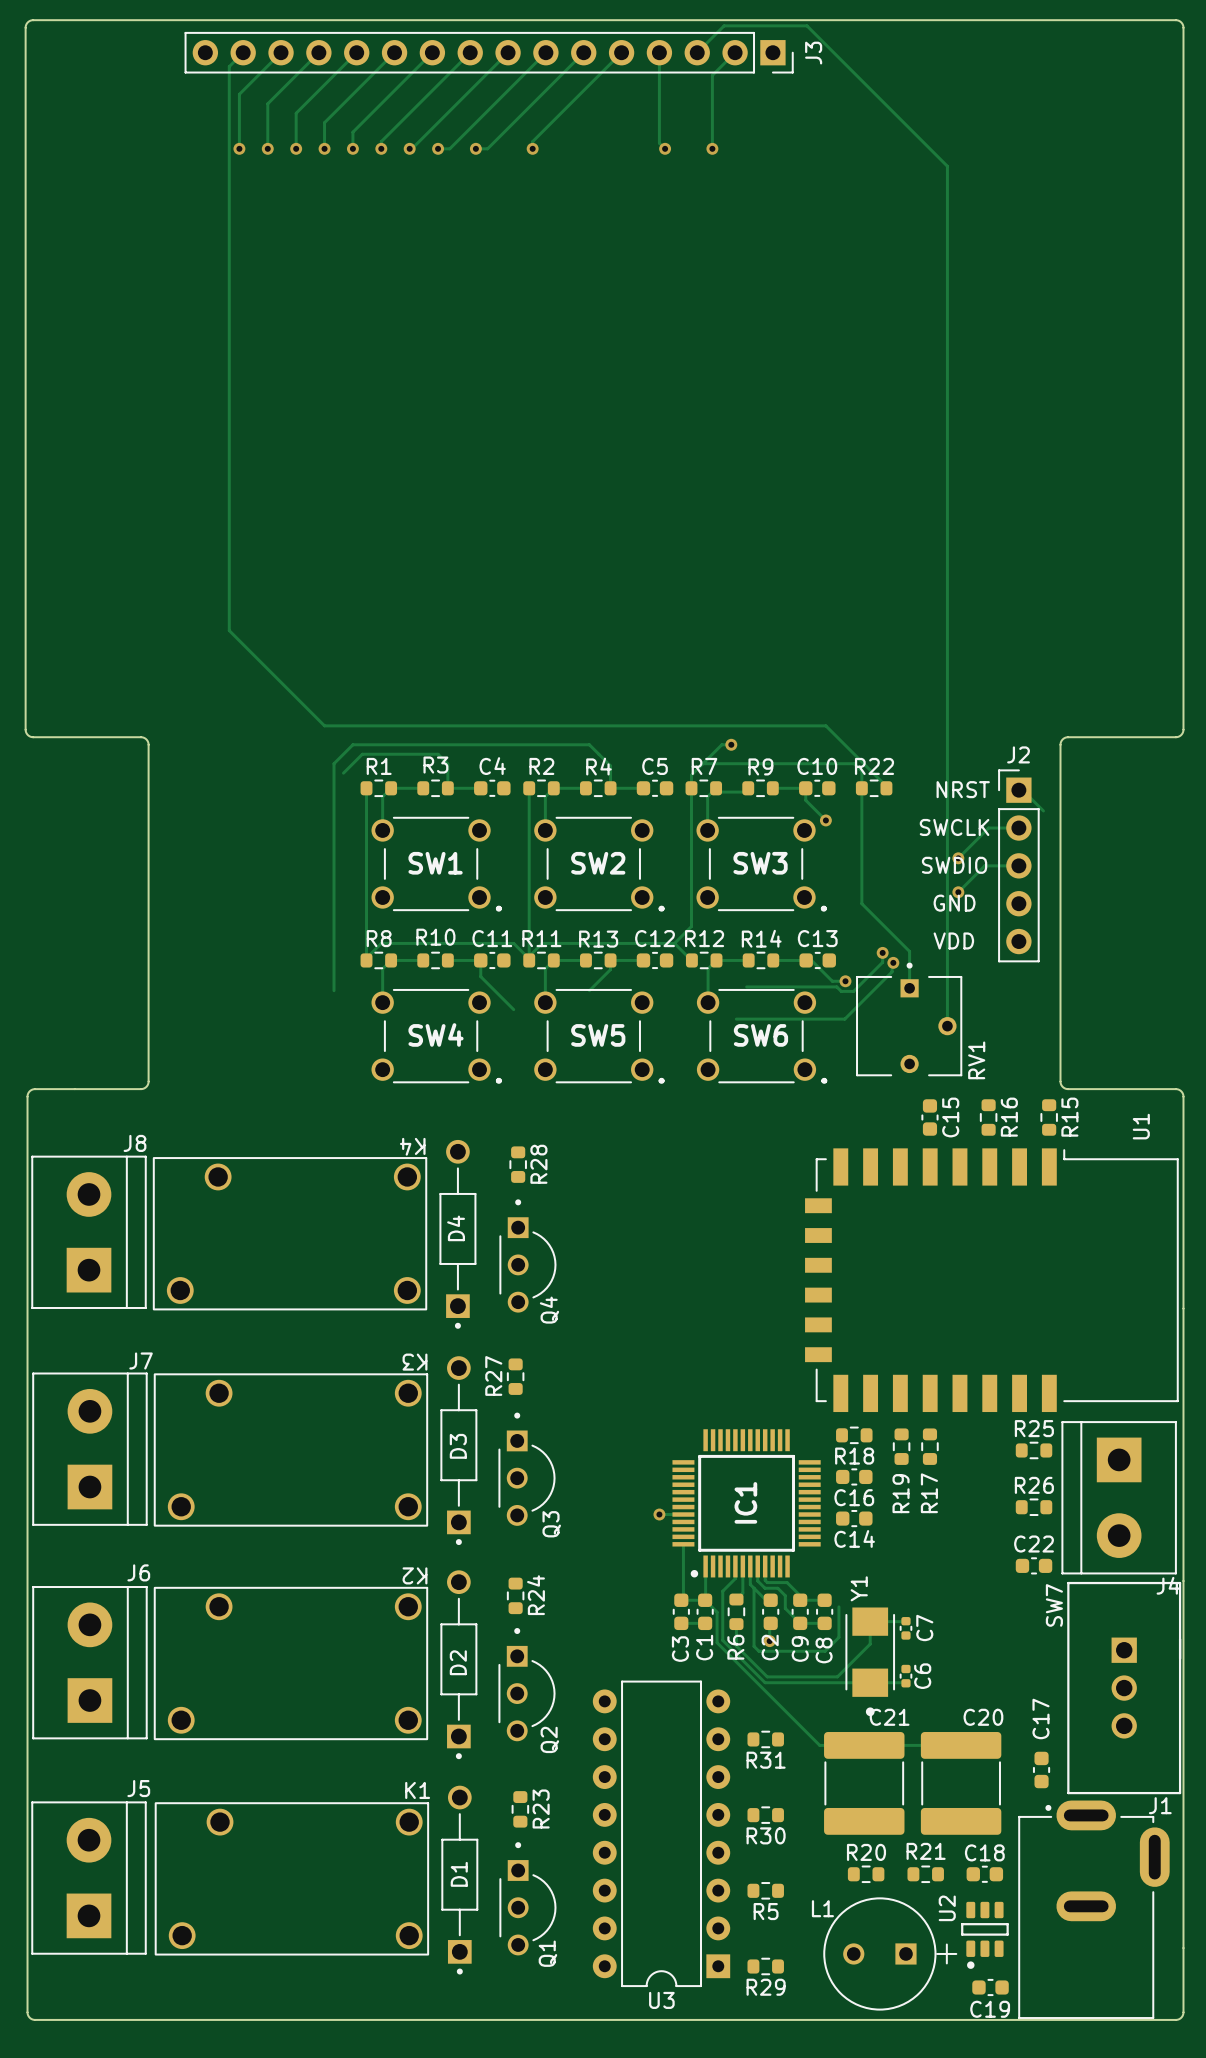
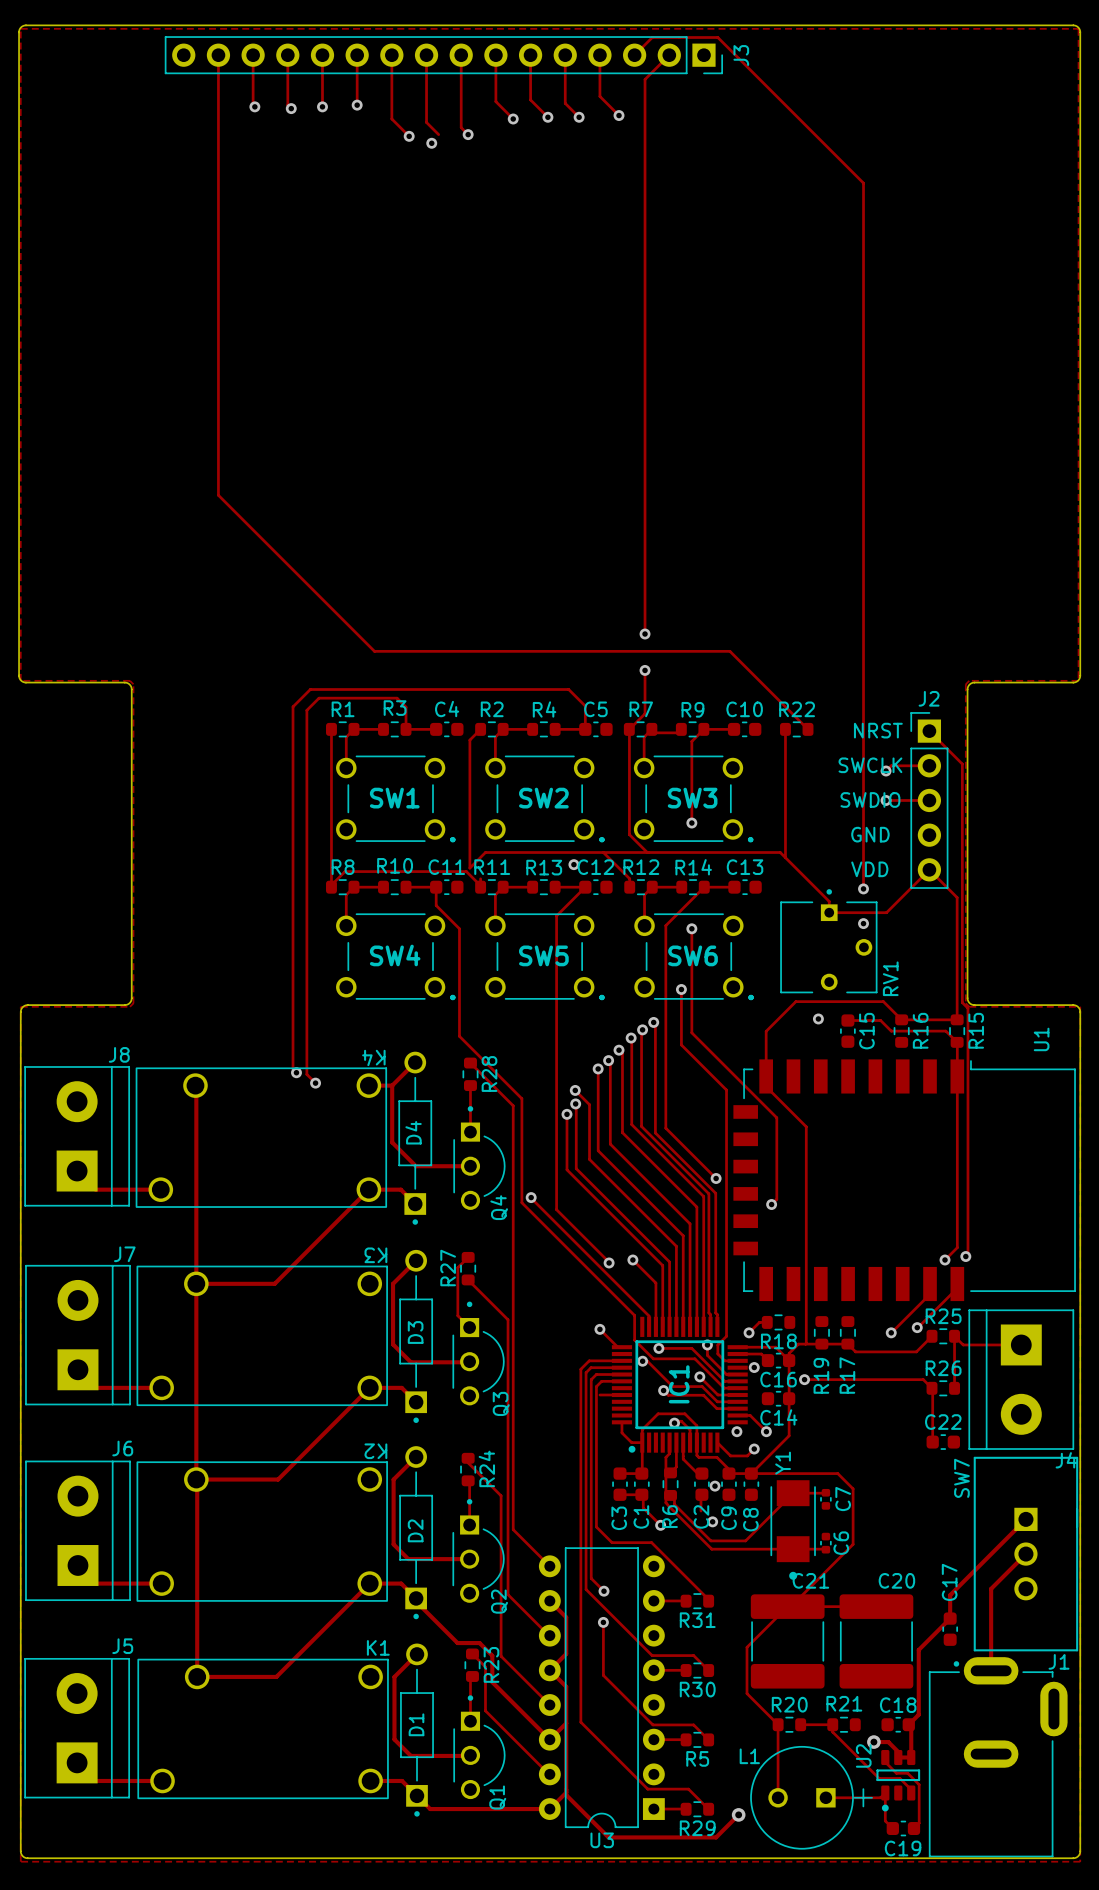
zone outline: none -> (20, 28) (20, 680) (130, 680) (133, 684) (133, 1003) (130, 1006) (20, 1006) (20, 1861) (1080, 1861) (1080, 1006) (969, 1006) (965, 1003) (965, 684) (969, 680) (1078, 680) (1078, 28) (20, 28)
track: (716, 33) (724, 25) (806, 25) (947, 166) (947, 1026) -> (652, 37) (717, 37) (863, 183) (863, 888)
track: (243, 52) (229, 66) (229, 630) (324, 725) (825, 725) (886, 788) -> (218, 55) (218, 495) (374, 651) (729, 651) (808, 729)
track: (281, 52) (239, 94) (239, 148) -> (253, 55) (253, 105) (254, 106)
track: (318, 52) (267, 103) (267, 148) -> (287, 55) (287, 105) (291, 108)
track: (356, 52) (296, 113) (296, 148) -> (322, 55) (322, 106)
track: (394, 52) (324, 122) (324, 148) -> (357, 55) (357, 105)
track: (432, 52) (352, 132) (352, 148) -> (391, 55) (391, 119) (409, 136)
track: (470, 52) (381, 141) (381, 148) -> (426, 55) (426, 122) (438, 134)
track: (508, 52) (411, 148) (409, 148) -> (461, 55) (461, 127) (468, 134)
track: (545, 52) (449, 148) (438, 148) -> (495, 55) (495, 101) (513, 119)
track: (583, 52) (487, 148) (475, 148) -> (530, 55) (530, 99) (547, 117)
track: (621, 52) (532, 141) (532, 148) -> (565, 55) (565, 103) (579, 117)
track: (712, 75) (712, 148) -> (648, 75) (645, 79) (645, 634)
track: (659, 97) (659, 143) (665, 148) -> (599, 96) (619, 115)
via: none -> (357, 105)
via: none -> (254, 106)
via: none -> (322, 106)
via: none -> (291, 108)
via: none -> (619, 115)
via: none -> (547, 117)
via: none -> (579, 117)
via: none -> (513, 119)
via: (239, 148) -> none
via: (267, 148) -> none
via: (296, 148) -> none
via: (324, 148) -> none
via: (352, 148) -> none
via: (381, 148) -> none
via: (409, 148) -> none
via position: (438, 148) -> (409, 136)
via position: (532, 148) -> (468, 134)
via: (665, 148) -> none
via: (712, 148) -> none
via: none -> (645, 634)
track: none -> (645, 670) (645, 713) (629, 729)
track: (352, 744) (334, 763) (334, 990) -> (319, 689) (310, 689) (293, 706) (293, 1069) (296, 1072)
track: (589, 744) (610, 765) (610, 788) -> (535, 689) (568, 689) (585, 706) (585, 729)
track: (731, 744) (721, 744) (691, 775) (691, 926) (674, 943) -> none
via position: (731, 744) -> (645, 670)
track: (362, 754) (343, 773) -> (327, 698) (319, 698) (306, 710) (306, 1074) (315, 1083)
track: (702, 763) (854, 763) (861, 771) (861, 788) -> none
track: (529, 788) (529, 951) -> (480, 729) (469, 740) (469, 868) (485, 852) (780, 852) (829, 901)
track: none -> (629, 729) (629, 834) (647, 852)
track: none -> (703, 729) (691, 741) (691, 823)
track: (805, 788) (805, 800) (825, 820) -> none
track: (1018, 790) (1022, 790) (1043, 811) -> (929, 731) (962, 764) (962, 1002) (967, 1008) (967, 1254) (965, 1256)
via: (825, 820) -> none
track: (988, 828) (958, 858) -> (901, 765) (891, 765) (886, 771)
via: none -> (886, 771)
via: (958, 858) -> none
via: none -> (886, 800)
track: (984, 865) (958, 892) -> (898, 800) (886, 800)
via: none -> (691, 823)
via: (958, 892) -> none
track: (861, 903) (909, 951) (909, 976) -> (785, 835) (785, 857)
via: none -> (573, 864)
track: (674, 943) (691, 960) -> (603, 852) (629, 878) (629, 887)
track: (674, 943) (542, 943) (529, 956) -> none
track: (882, 952) (882, 962) (853, 991) (841, 991) (836, 986) (746, 986) -> none
via: (882, 952) -> none
track: (610, 960) (610, 969) (589, 990) -> none
track: none -> (585, 887) (556, 915) (556, 1209) (609, 1262)
track: none -> (704, 887) (665, 925) (665, 1128) (716, 1178)
track: (806, 960) (811, 960) (832, 981) (845, 981) -> none
track: (893, 962) (892, 971) (844, 1019) (736, 1019) -> none
via: (893, 962) -> none
via: none -> (863, 888)
track: (480, 976) (513, 1009) -> (436, 902) (436, 905) (459, 928) (459, 1036) (521, 1098) (521, 1202) (634, 1315) (634, 1340) (653, 1358) (694, 1358) (724, 1388) (737, 1388)
via: (845, 981) -> none
track: none -> (829, 912) (886, 912) (929, 869) (957, 897) (957, 1019) (901, 1019) (883, 1001) (795, 1001) (766, 1031) (766, 1086) (806, 1126) (805, 1344)
via: none -> (863, 923)
track: none -> (691, 928) (691, 1032) (776, 1117) (776, 1199) (771, 1204)
via: none -> (691, 928)
track: none -> (681, 989) (681, 1044) (726, 1090) (726, 1336) (717, 1344) (717, 1353) (724, 1360) (737, 1360)
via: none -> (681, 989)
via: none -> (818, 1018)
track: none -> (847, 1020) (880, 1020) (891, 1031) (945, 1031) (957, 1042) (957, 1247) (945, 1260)
track: none -> (653, 1022) (655, 1024) (655, 1133) (715, 1193) (717, 1326)
via: none -> (653, 1022)
track: none -> (642, 1029) (641, 1126) (708, 1193) (710, 1326)
via: none -> (642, 1029)
track: none -> (631, 1038) (631, 1124) (703, 1196) (703, 1326)
via: none -> (631, 1038)
track: none -> (619, 1050) (622, 1053) (622, 1132) (696, 1207) (696, 1326)
via: none -> (619, 1050)
track: none -> (608, 1060) (610, 1062) (610, 1144) (690, 1223) (690, 1326)
via: none -> (608, 1060)
track: none -> (415, 1062) (392, 1085) (368, 1085)
track: none -> (470, 1063) (513, 1105) (513, 1529) (549, 1566)
track: none -> (598, 1068) (598, 1150) (683, 1235) (683, 1326)
via: none -> (598, 1068)
via: none -> (296, 1072)
via: none -> (315, 1083)
track: none -> (195, 1085) (196, 1479)
track: none -> (391, 1085) (392, 1142) (415, 1166) (470, 1166)
track: none -> (470, 1085) (470, 1132)
track: none -> (575, 1090) (589, 1104) (589, 1159) (676, 1246) (676, 1326)
via: none -> (575, 1090)
track: none -> (575, 1103) (576, 1168) (669, 1262) (669, 1326)
via: none -> (575, 1103)
track: none -> (566, 1114) (566, 1169) (662, 1265) (662, 1326)
via: none -> (566, 1114)
track: none -> (77, 1171) (95, 1189) (160, 1189)
via: none -> (716, 1178)
track: none -> (531, 1197) (649, 1316) (649, 1326)
via: none -> (531, 1197)
track: none -> (415, 1204) (400, 1189) (368, 1189) (274, 1283) (196, 1283)
via: none -> (771, 1204)
via: none -> (965, 1256)
track: none -> (468, 1257) (457, 1267) (457, 1315) (469, 1327)
track: none -> (632, 1260) (655, 1283) (655, 1326)
via: none -> (632, 1260)
via: none -> (945, 1260)
track: none -> (416, 1260) (393, 1283) (393, 1344) (410, 1362) (469, 1361)
via: none -> (609, 1262)
track: none -> (468, 1279) (508, 1319) (508, 1594) (549, 1635)
track: none -> (930, 1284) (930, 1294) (891, 1332)
track: none -> (957, 1284) (957, 1288) (917, 1327)
track: none -> (767, 1322) (759, 1322) (749, 1332)
via: none -> (917, 1327)
track: none -> (599, 1329) (617, 1347) (621, 1347)
via: none -> (599, 1329)
via: none -> (749, 1332)
via: none -> (891, 1332)
track: none -> (932, 1336) (916, 1351) (855, 1351) (847, 1344) (798, 1344) (789, 1353) (789, 1435) (751, 1473) (837, 1473) (853, 1488) (853, 1544) (790, 1606)
track: none -> (707, 1344) (707, 1355) (726, 1374) (737, 1374)
via: none -> (707, 1344)
track: none -> (1021, 1344) (963, 1344) (954, 1336) (954, 1388)
track: none -> (737, 1347) (775, 1347) (789, 1360)
track: none -> (658, 1348) (691, 1348) (724, 1381) (737, 1381)
via: none -> (658, 1348)
track: none -> (737, 1354) (761, 1354) (767, 1360)
track: none -> (621, 1360) (589, 1360) (580, 1369) (580, 1722) (647, 1789) (688, 1789) (708, 1809)
track: none -> (642, 1361) (647, 1361) (672, 1386) (702, 1386) (717, 1401) (737, 1401)
via: none -> (642, 1361)
track: none -> (621, 1367) (591, 1367) (586, 1372) (586, 1589) (652, 1655) (693, 1655) (708, 1670)
via: none -> (754, 1367)
track: none -> (77, 1369) (96, 1387) (161, 1387)
track: none -> (621, 1374) (596, 1374) (591, 1379) (591, 1578) (604, 1591)
track: none -> (699, 1376) (717, 1394) (737, 1394)
via: none -> (699, 1376)
track: none -> (804, 1379) (923, 1379) (932, 1389) (932, 1442)
via: none -> (804, 1379)
track: none -> (621, 1381) (601, 1381) (596, 1386) (596, 1527) (612, 1542) (651, 1542) (708, 1601)
track: none -> (663, 1390) (668, 1395) (703, 1395) (716, 1408) (737, 1408)
via: none -> (663, 1390)
via: (659, 1514) -> none
track: none -> (416, 1402) (401, 1387) (369, 1387) (278, 1479) (196, 1479)
track: none -> (737, 1415) (750, 1415) (766, 1431)
via: none -> (674, 1423)
via: none -> (736, 1431)
via: none -> (766, 1431)
track: (683, 1555) (683, 1598) (681, 1600) -> (621, 1432) (631, 1442) (642, 1442) (642, 1429) (658, 1413) (684, 1413) (696, 1425) (696, 1442)
track: (757, 1566) (757, 1580) (765, 1588) (777, 1588) (785, 1595) (785, 1608) (800, 1623) (824, 1623) -> (690, 1442) (690, 1429) (681, 1421) (674, 1423)
track: none -> (717, 1442) (730, 1455) (747, 1455) (754, 1449)
via: none -> (754, 1449)
track: none -> (416, 1457) (393, 1479) (393, 1544) (408, 1559) (469, 1559)
track: (731, 1582) (722, 1591) (722, 1640) (765, 1682) (781, 1682) -> (668, 1505) (711, 1549)
track: none -> (665, 1457) (665, 1502) (667, 1504)
track: none -> (468, 1458) (468, 1462) (501, 1495) (501, 1656) (549, 1705)
track: (754, 1588) (754, 1646) (758, 1651) (825, 1651) (838, 1637) (838, 1606) -> none
track: (705, 1600) (717, 1612) (717, 1642) (819, 1745) (864, 1745) -> (778, 1724) (747, 1693) (747, 1647) (787, 1606)
track: none -> (196, 1479) (197, 1676) (276, 1676) (369, 1583) (401, 1583) (416, 1598) (416, 1601) (457, 1643) (479, 1643) (492, 1655) (492, 1682) (549, 1739) (566, 1723)
track: none -> (468, 1480) (469, 1524)
via: none -> (715, 1486)
track: (870, 1621) (870, 1644) (837, 1676) (767, 1676) (736, 1646) (736, 1624) -> (793, 1493) (745, 1540) (710, 1540) (674, 1504) (674, 1494)
track: none -> (643, 1494) (643, 1507) (660, 1525)
via: (769, 1641) -> none
track: none -> (1025, 1519) (950, 1595) (950, 1618) (918, 1649) (918, 1714) (908, 1724) (911, 1727) (911, 1757) (898, 1757) (898, 1751) (888, 1742) (873, 1742)
via: none -> (712, 1521)
via: none -> (660, 1525)
track: none -> (1025, 1554) (991, 1588) (991, 1670)
track: none -> (77, 1565) (96, 1583) (161, 1583)
via: none -> (604, 1591)
track: none -> (549, 1600) (566, 1617) (566, 1653) (549, 1670) (566, 1686) (566, 1795) (608, 1837) (716, 1837) (738, 1814)
track: none -> (653, 1600) (686, 1601)
track: none -> (603, 1622) (603, 1675) (652, 1724) (693, 1724) (708, 1739)
via: none -> (603, 1622)
track: none -> (416, 1654) (394, 1676) (394, 1739) (410, 1755) (470, 1755)
track: none -> (472, 1653) (485, 1666) (485, 1710) (549, 1774)
track: none -> (653, 1670) (686, 1670)
track: none -> (472, 1676) (470, 1678) (470, 1721)
track: none -> (778, 1724) (778, 1797)
track: none -> (800, 1724) (832, 1724) (832, 1732) (879, 1778) (899, 1778) (911, 1789) (911, 1793)
track: none -> (653, 1739) (686, 1739)
via: none -> (873, 1742)
track: none -> (885, 1757) (885, 1762) (896, 1773) (907, 1773) (919, 1784) (919, 1823) (913, 1828)
track: none -> (77, 1762) (95, 1780) (162, 1780)
track: none -> (370, 1780) (402, 1780) (430, 1809) (549, 1809) (566, 1792)
track: none -> (825, 1797) (880, 1797) (885, 1793) (885, 1820) (892, 1828)
track: none -> (653, 1809) (686, 1809)
via: none -> (738, 1814)

